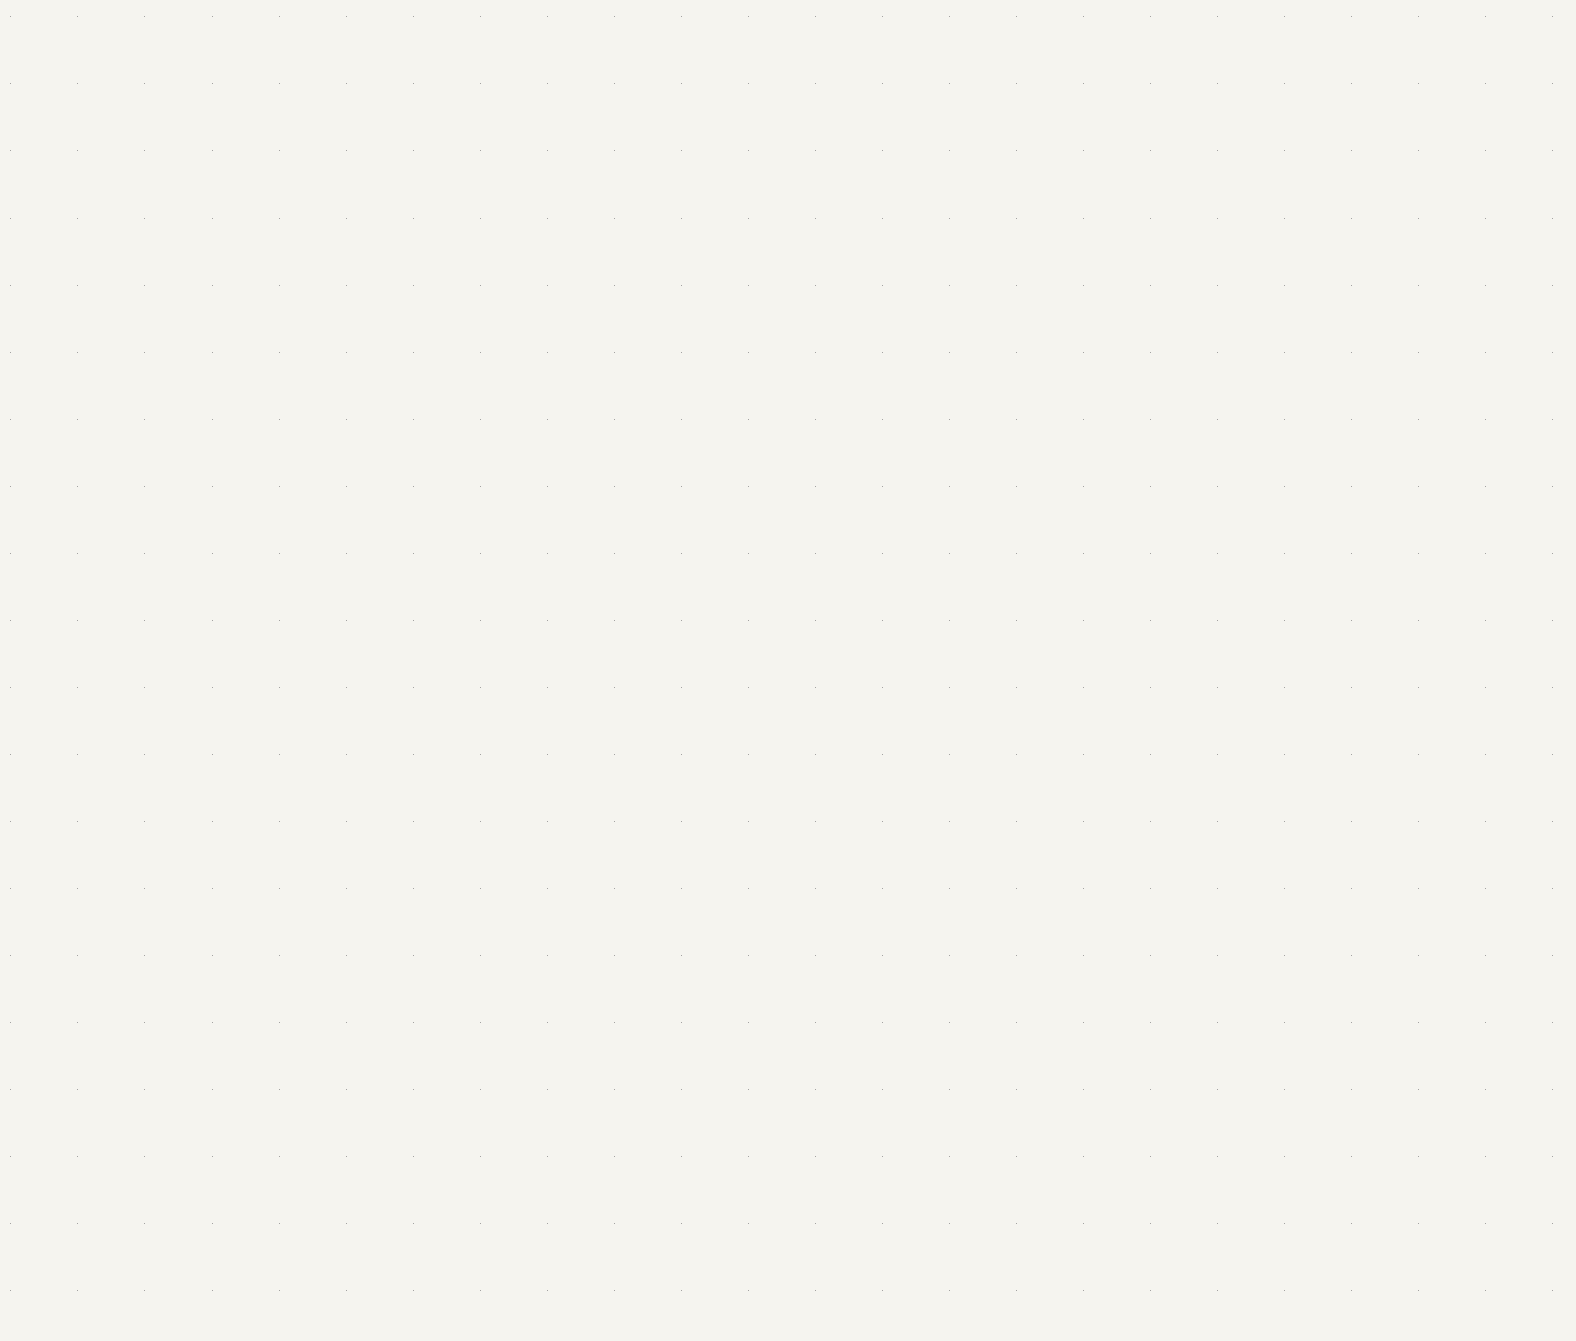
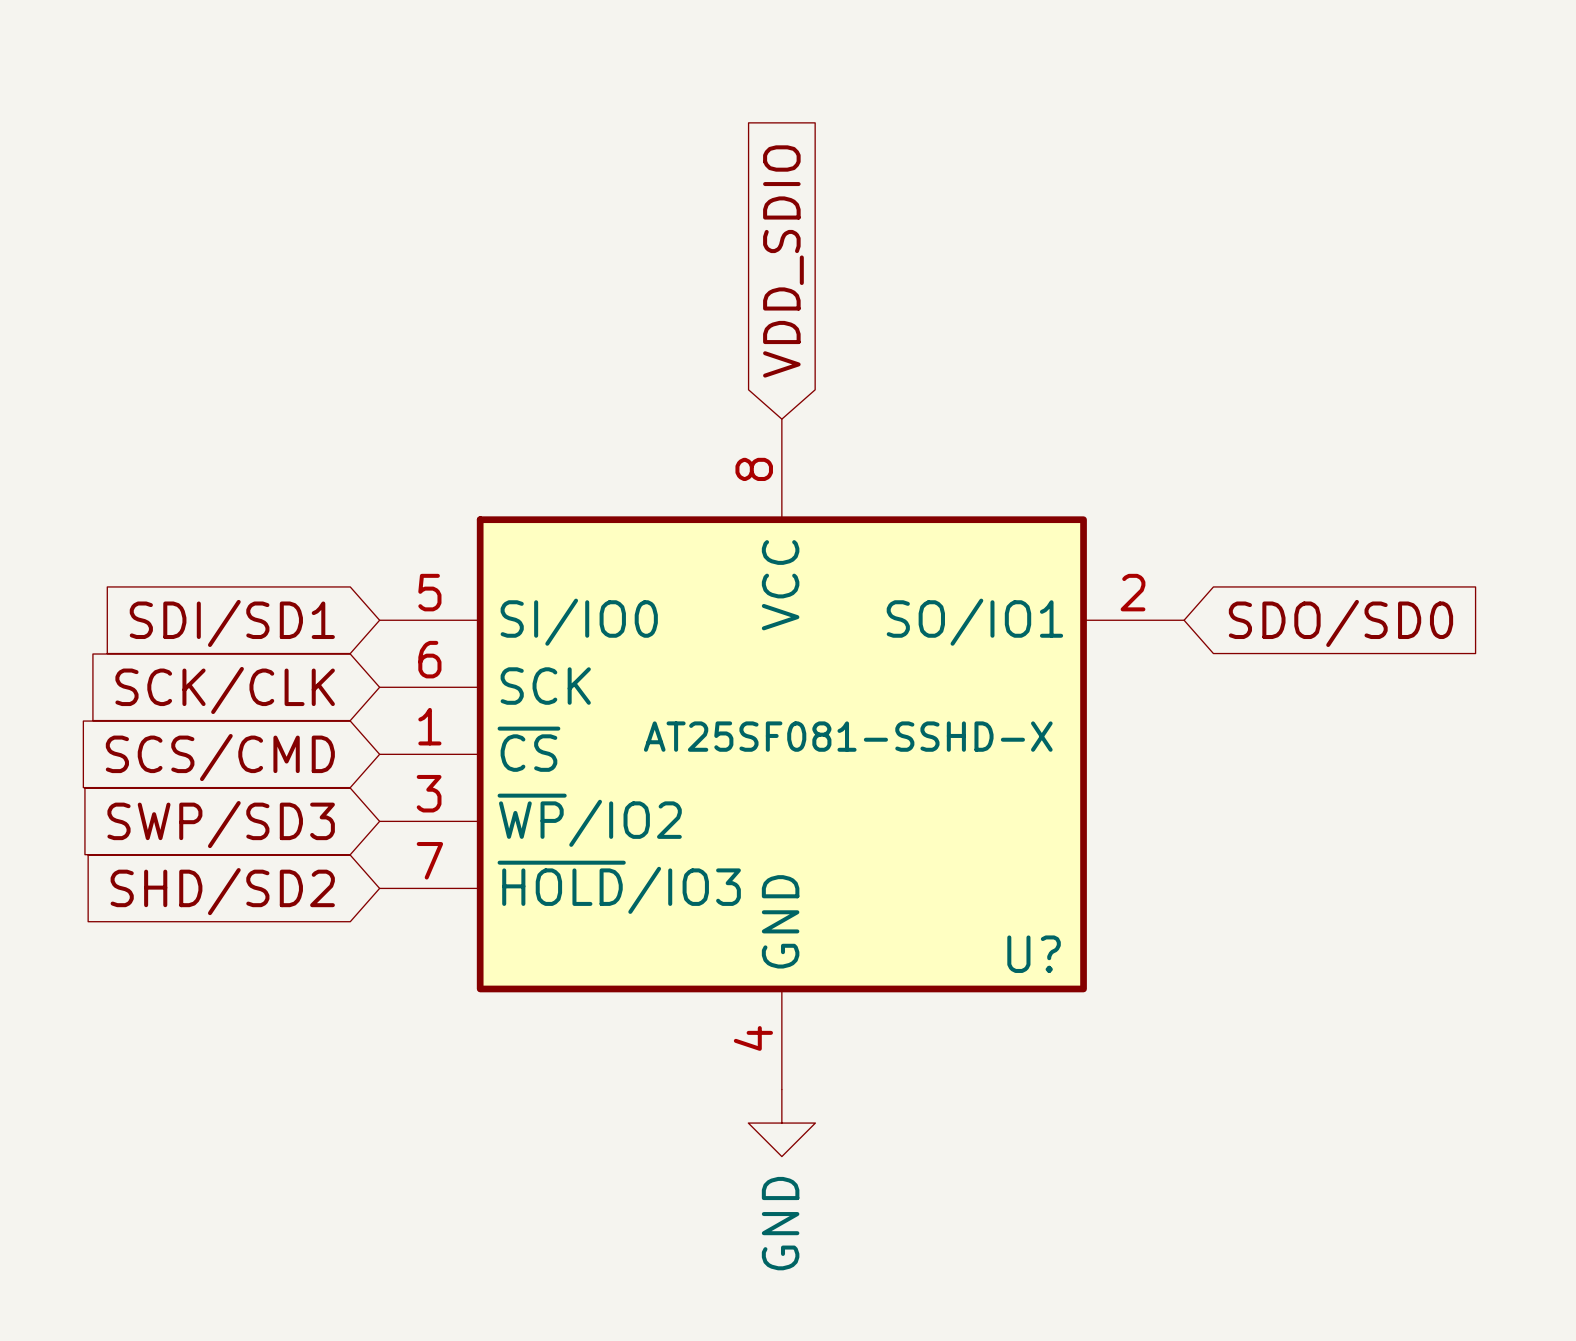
global label: none -> VDD_SDIO (783, 261)
global label: none -> SDI/SD1 (232, 623)
global label: none -> SDO/SD0 (1340, 623)
global label: none -> SCK/CLK (225, 690)
global label: none -> SCS/CMD (220, 757)
U?: none -> AT25SF081-SSHD-X (781, 754)
global label: none -> SWP/SD3 (221, 824)
global label: none -> SHD/SD2 (222, 891)
power symbol: none -> GND (781, 1123)

